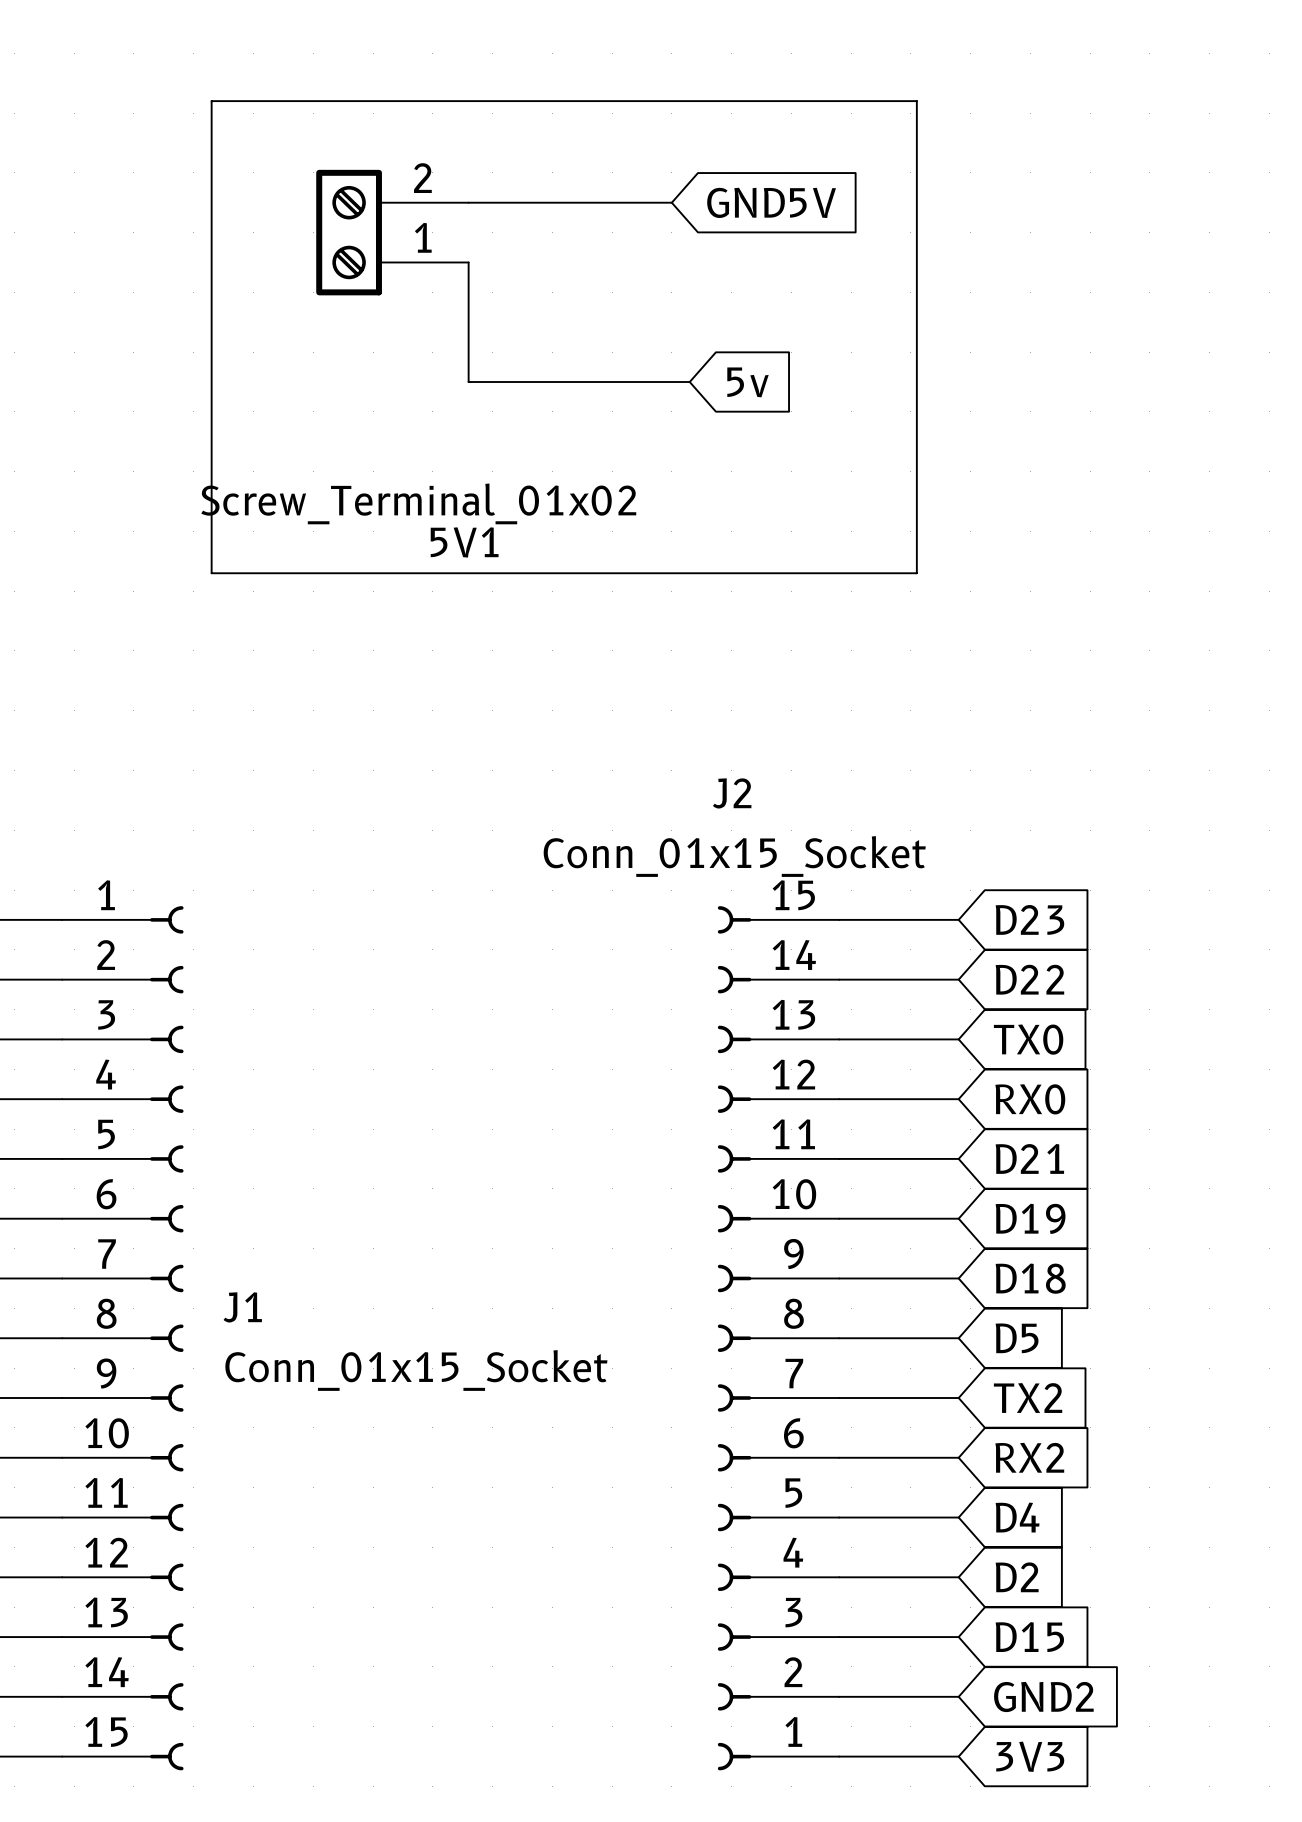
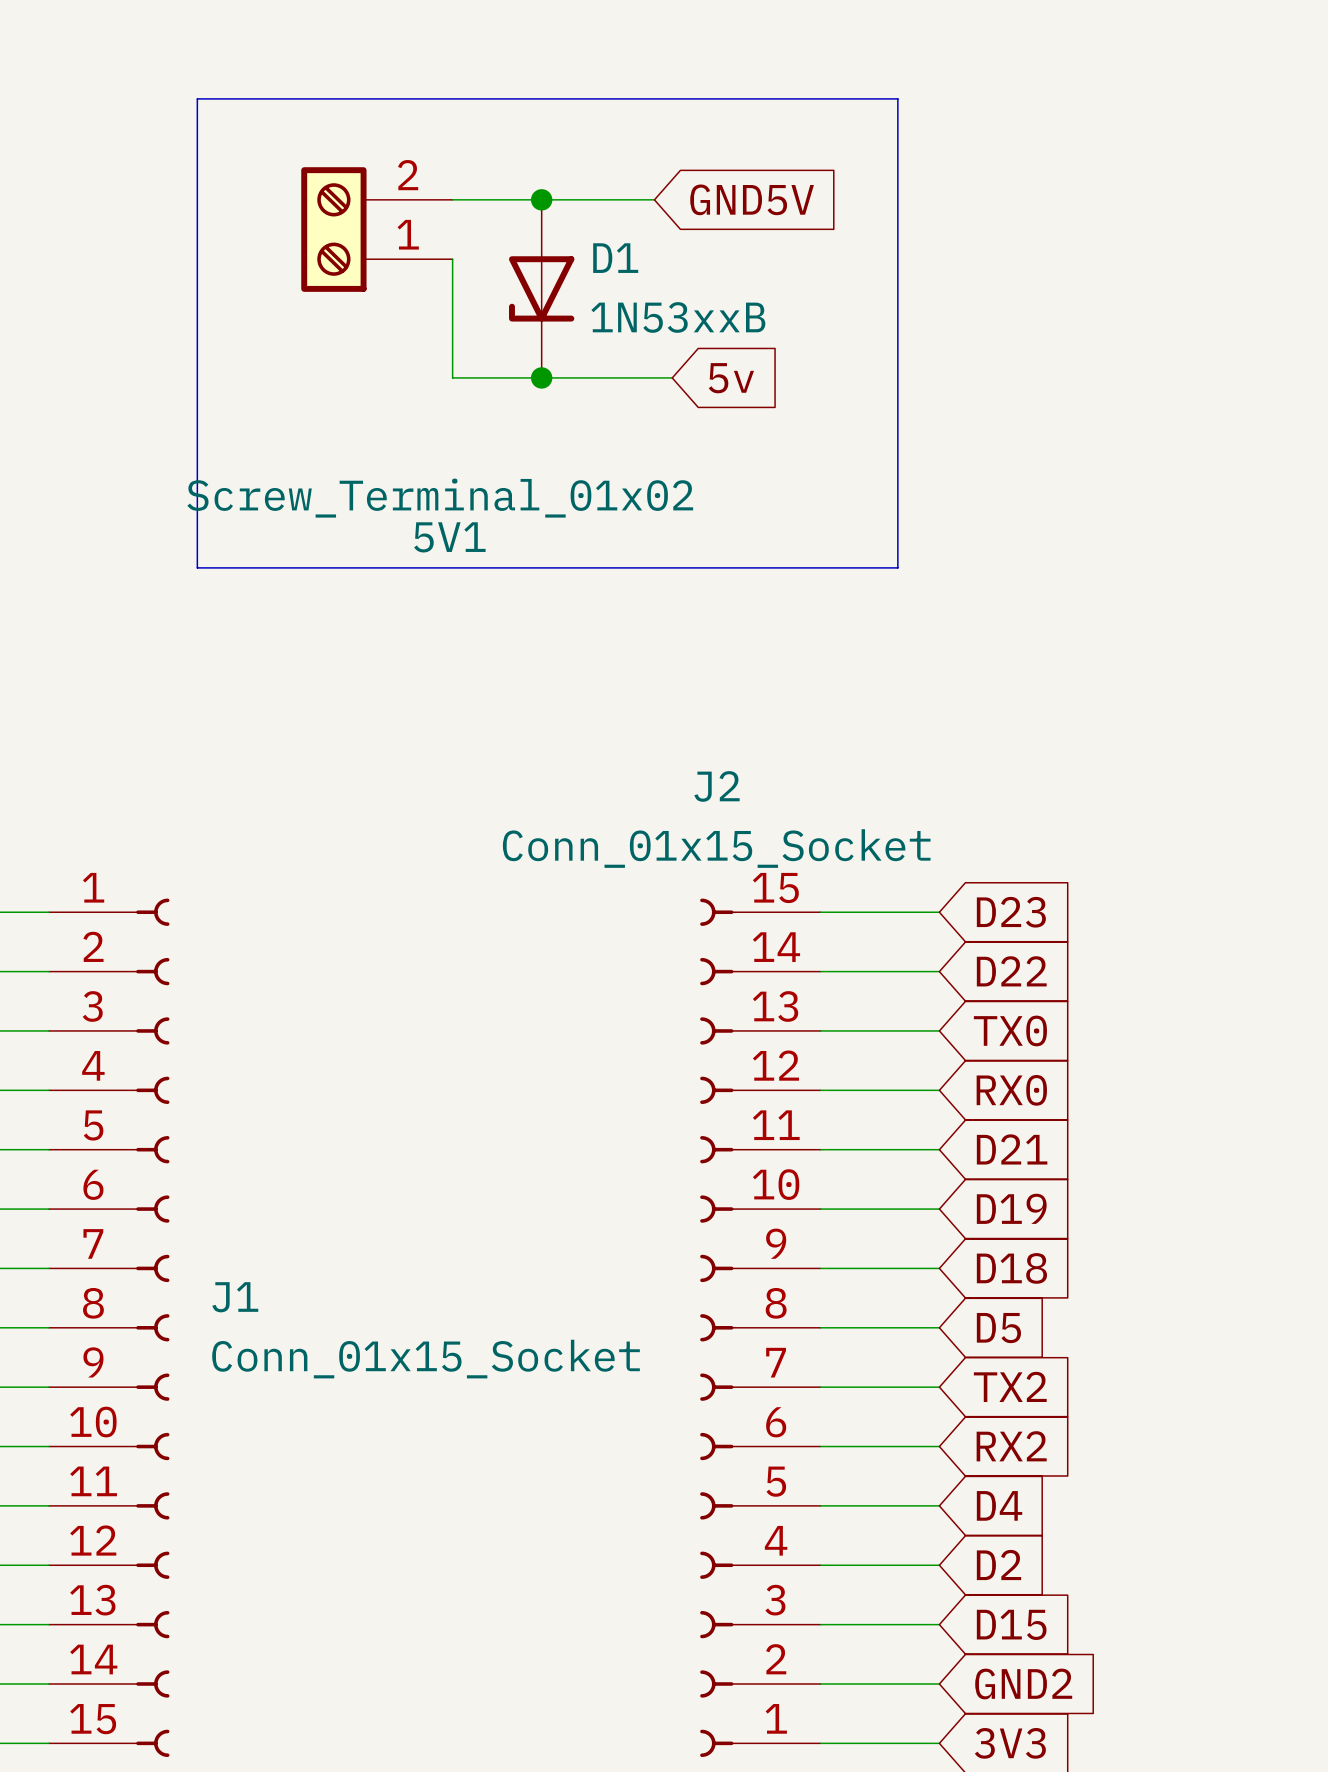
junction: none -> (541, 199)
D1: none -> 1N53xxB (541, 288)
junction: none -> (541, 377)

